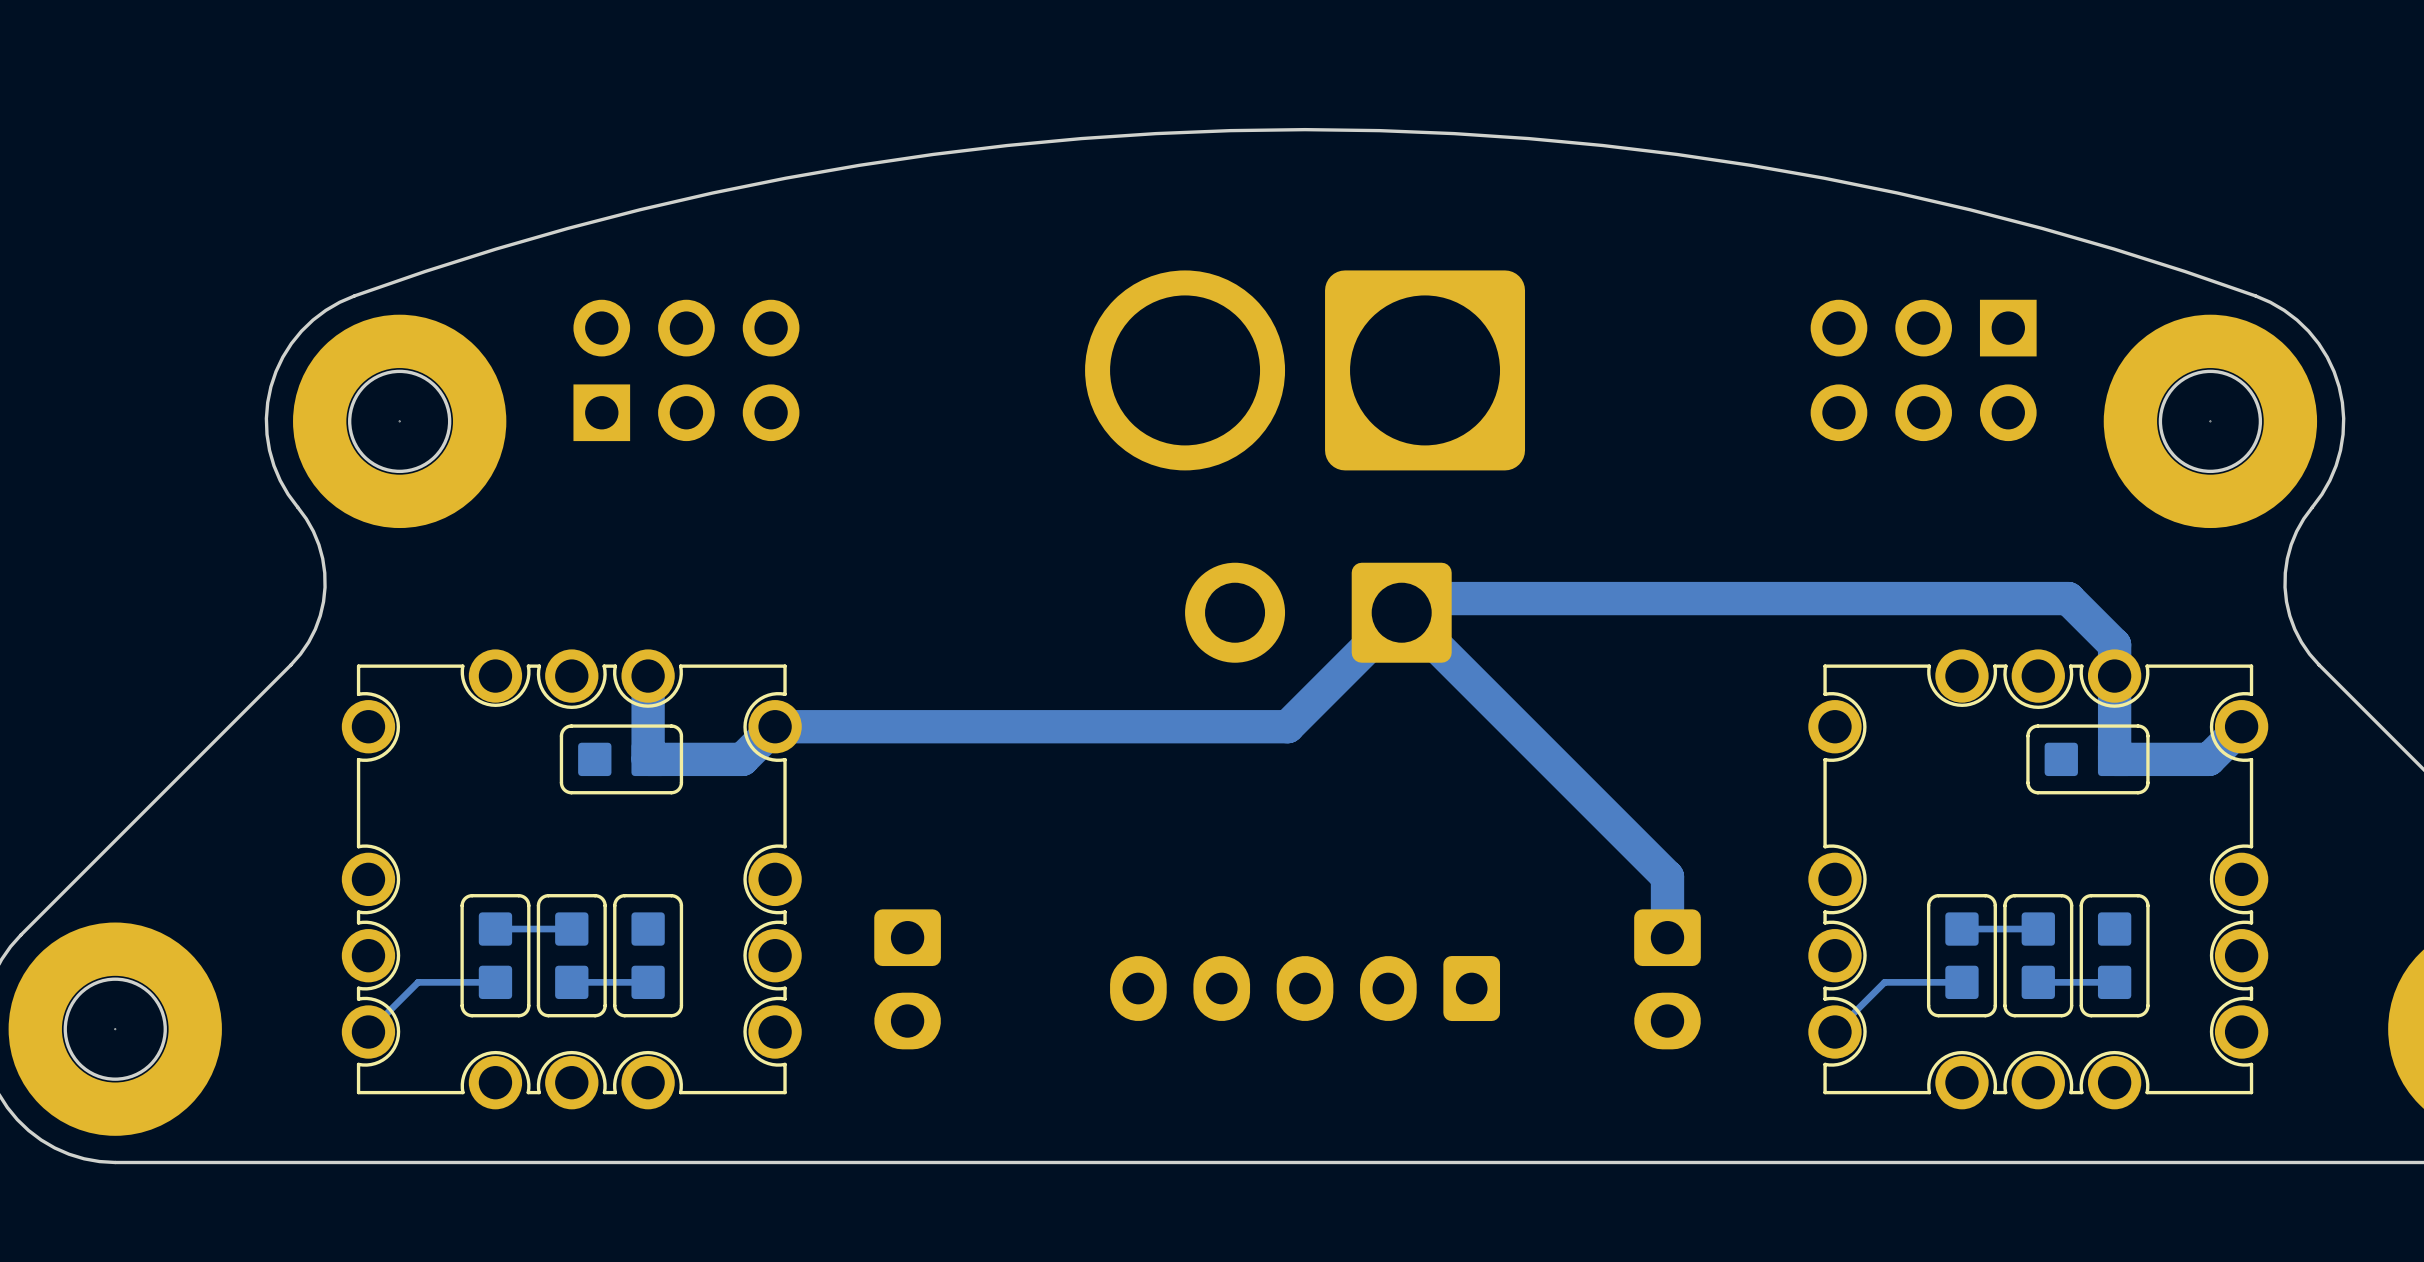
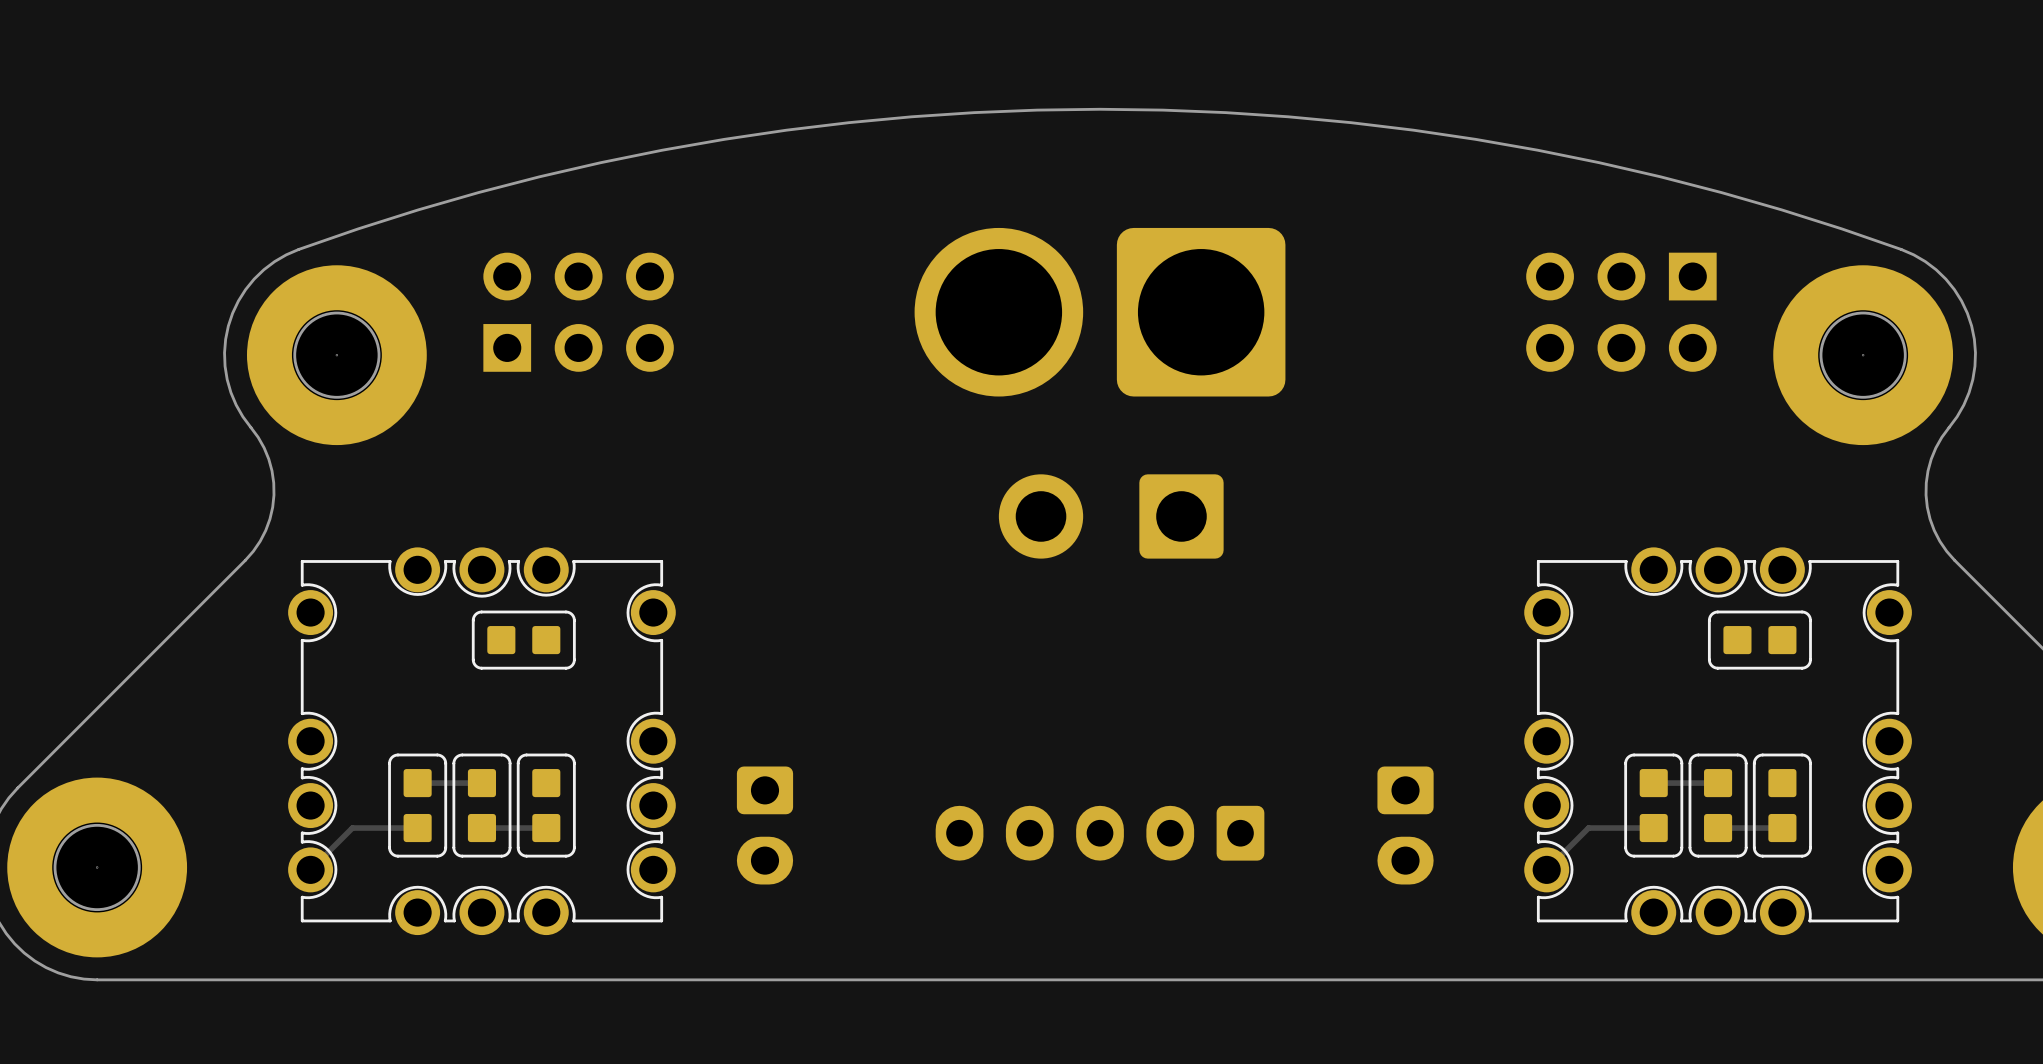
track: (1401, 612) (1667, 876) (1667, 937) -> none
track: (648, 676) (648, 759) (742, 759) (775, 726) (1287, 726) (1415, 598) (2068, 598) (2114, 644) (2114, 759) (2208, 759) (2241, 726) -> none

